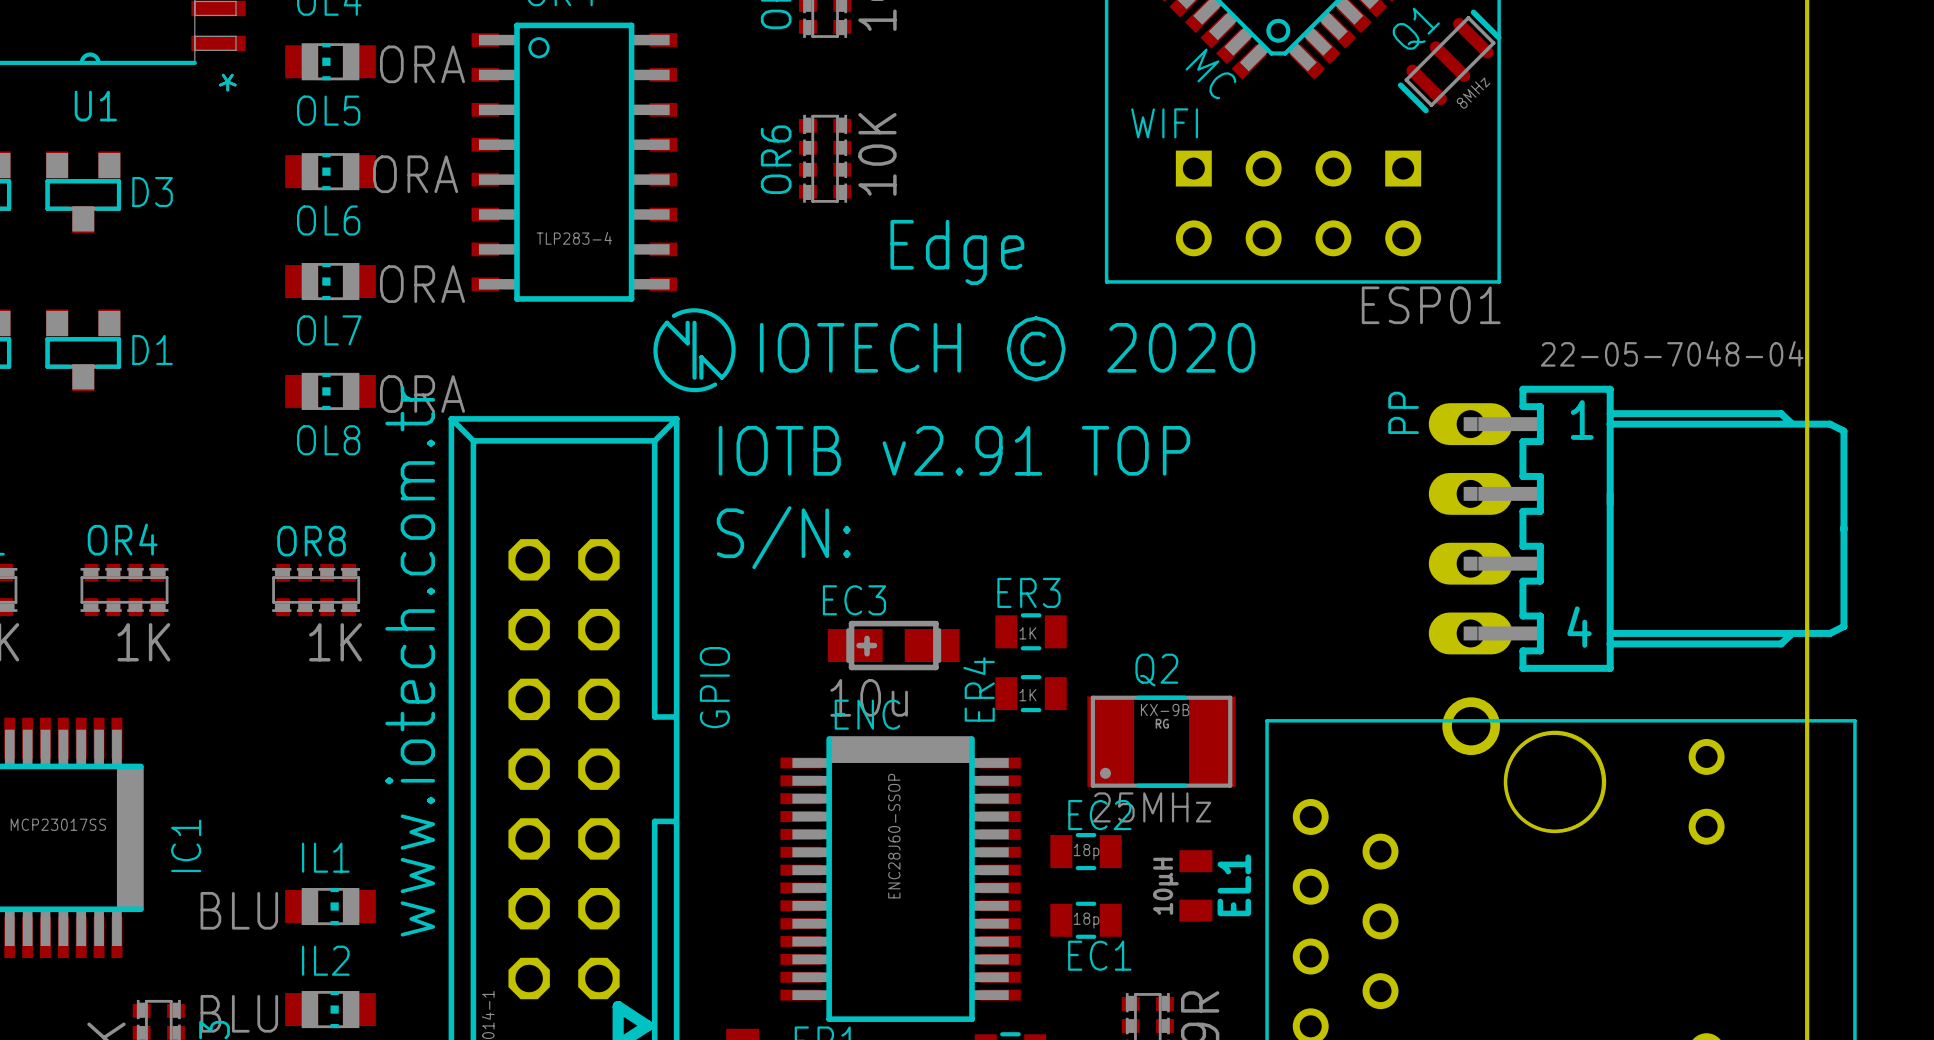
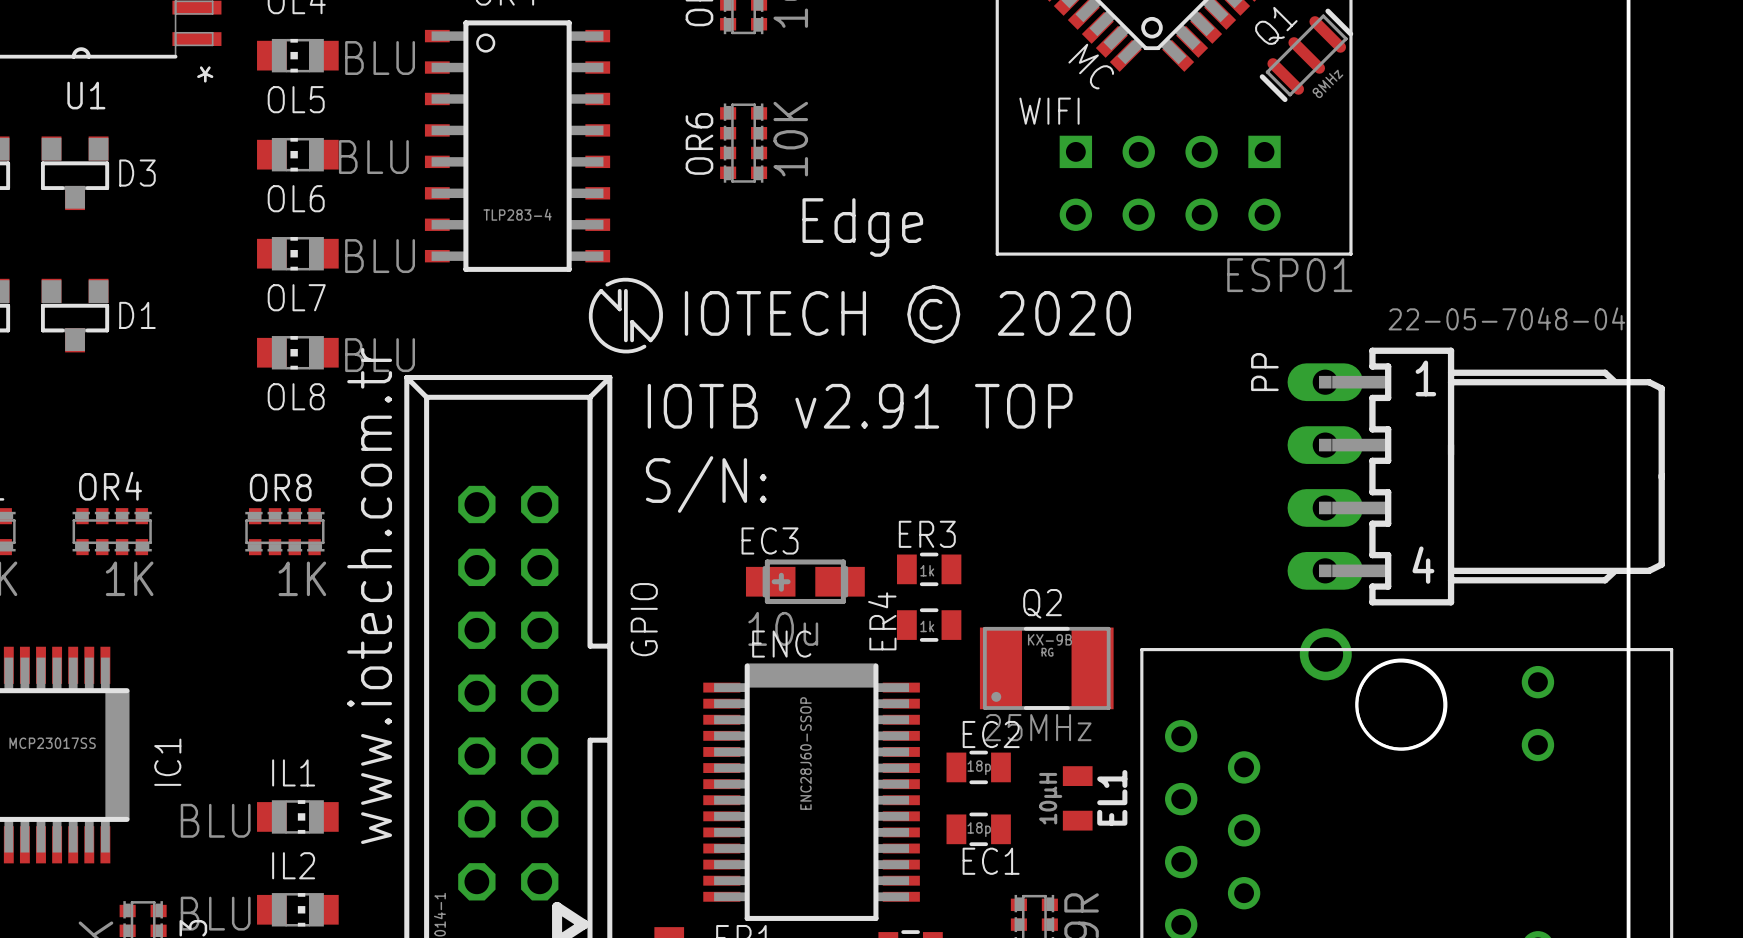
OL5 value: ORA (422, 64) -> BLU (380, 58)
OL6 value: ORA (415, 174) -> BLU (373, 157)
OL7 value: ORA (422, 284) -> BLU (380, 256)
OL8 value: ORA (422, 394) -> BLU (380, 355)
ER3 value: 1K (1027, 633) -> 1k (927, 570)
ER4 value: 1K (1027, 695) -> 1k (927, 626)

